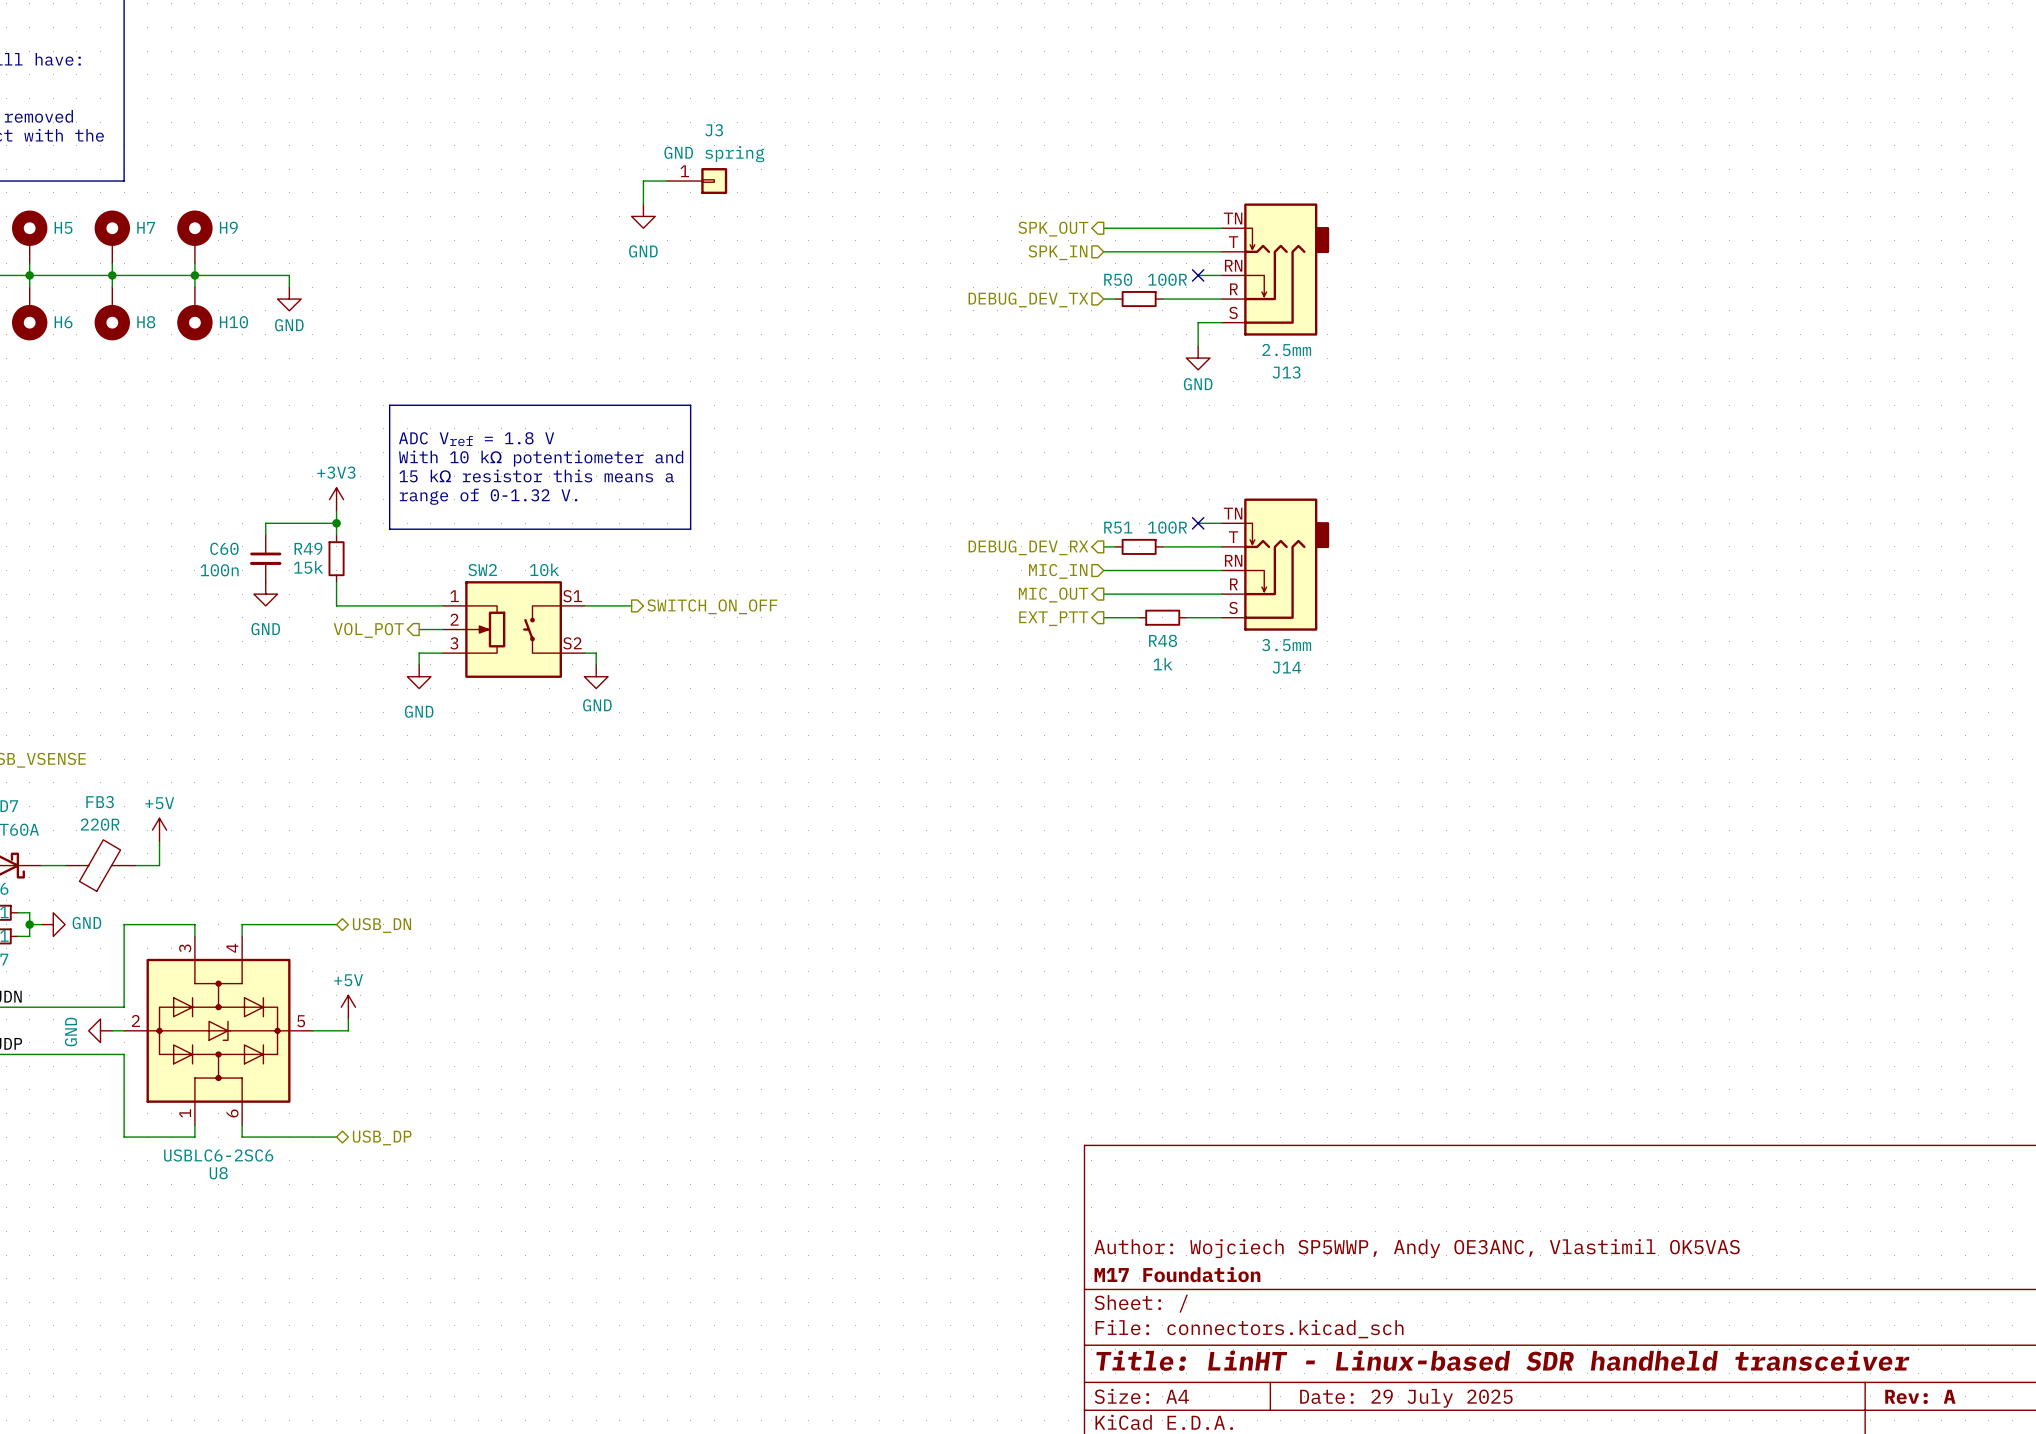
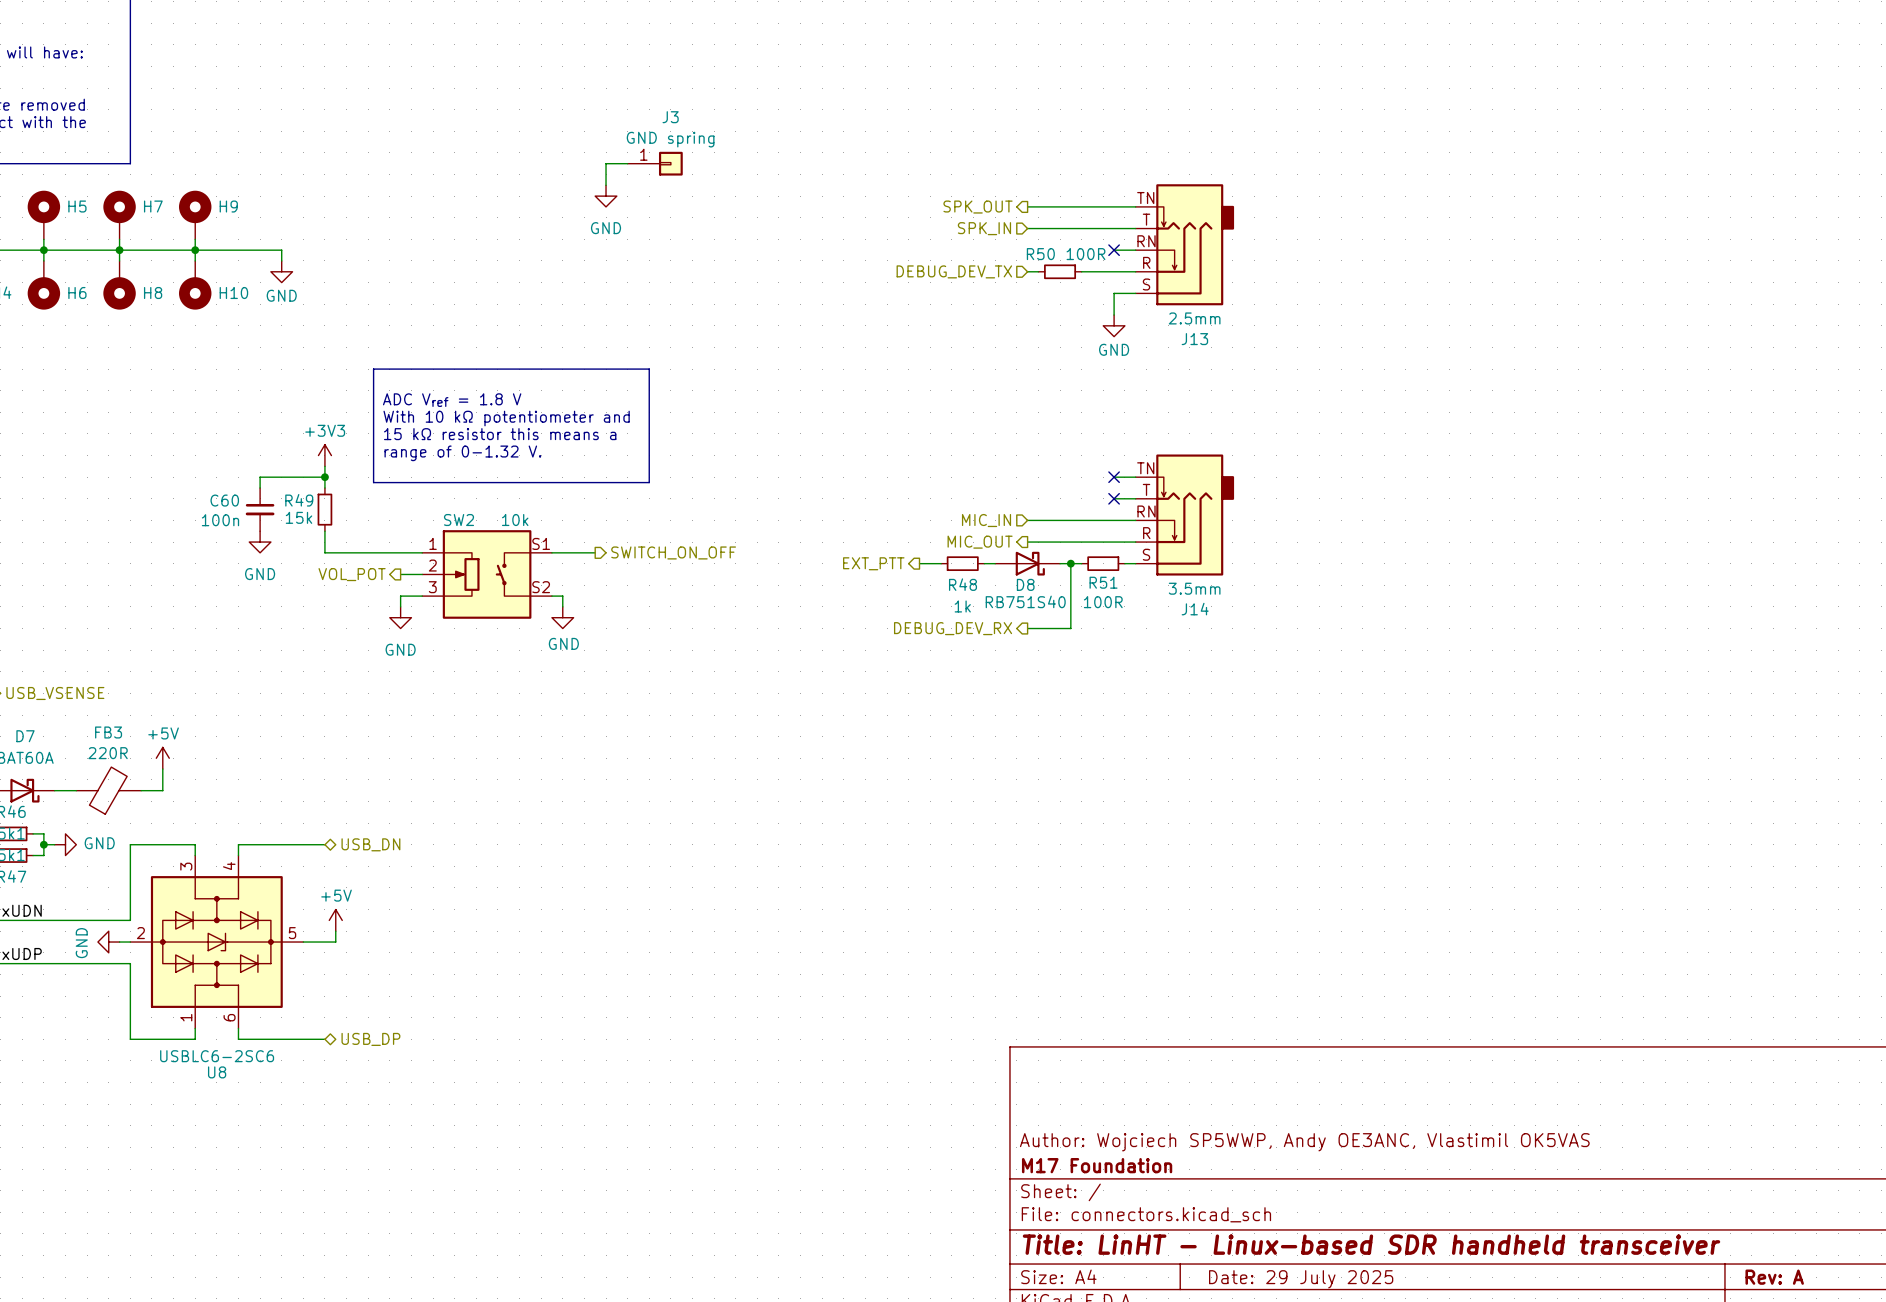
R51 name position: R51 (1118, 527) -> R51 (1103, 582)
R51 value position: 100R (1167, 527) -> 100R (1103, 602)
wire: (1103, 546) (1115, 546) -> (984, 563) (995, 563)
R51 position: (1139, 546) -> (1103, 563)
wire: (1162, 546) (1198, 546) -> none
no-connect mark: none -> (1114, 498)
hierarchical label position: DEBUG_DEV_RX (1028, 547) -> DEBUG_DEV_RX (953, 628)
D8: none -> RB751S40 (1027, 563)
wire: none -> (1070, 563) (1070, 628) (1027, 628)
junction: none -> (1070, 563)
R48 position: (1162, 617) -> (962, 563)
wire: (1186, 617) (1209, 617) -> (919, 563) (941, 563)
hierarchical label position: EXT_PTT (1053, 618) -> EXT_PTT (873, 563)

